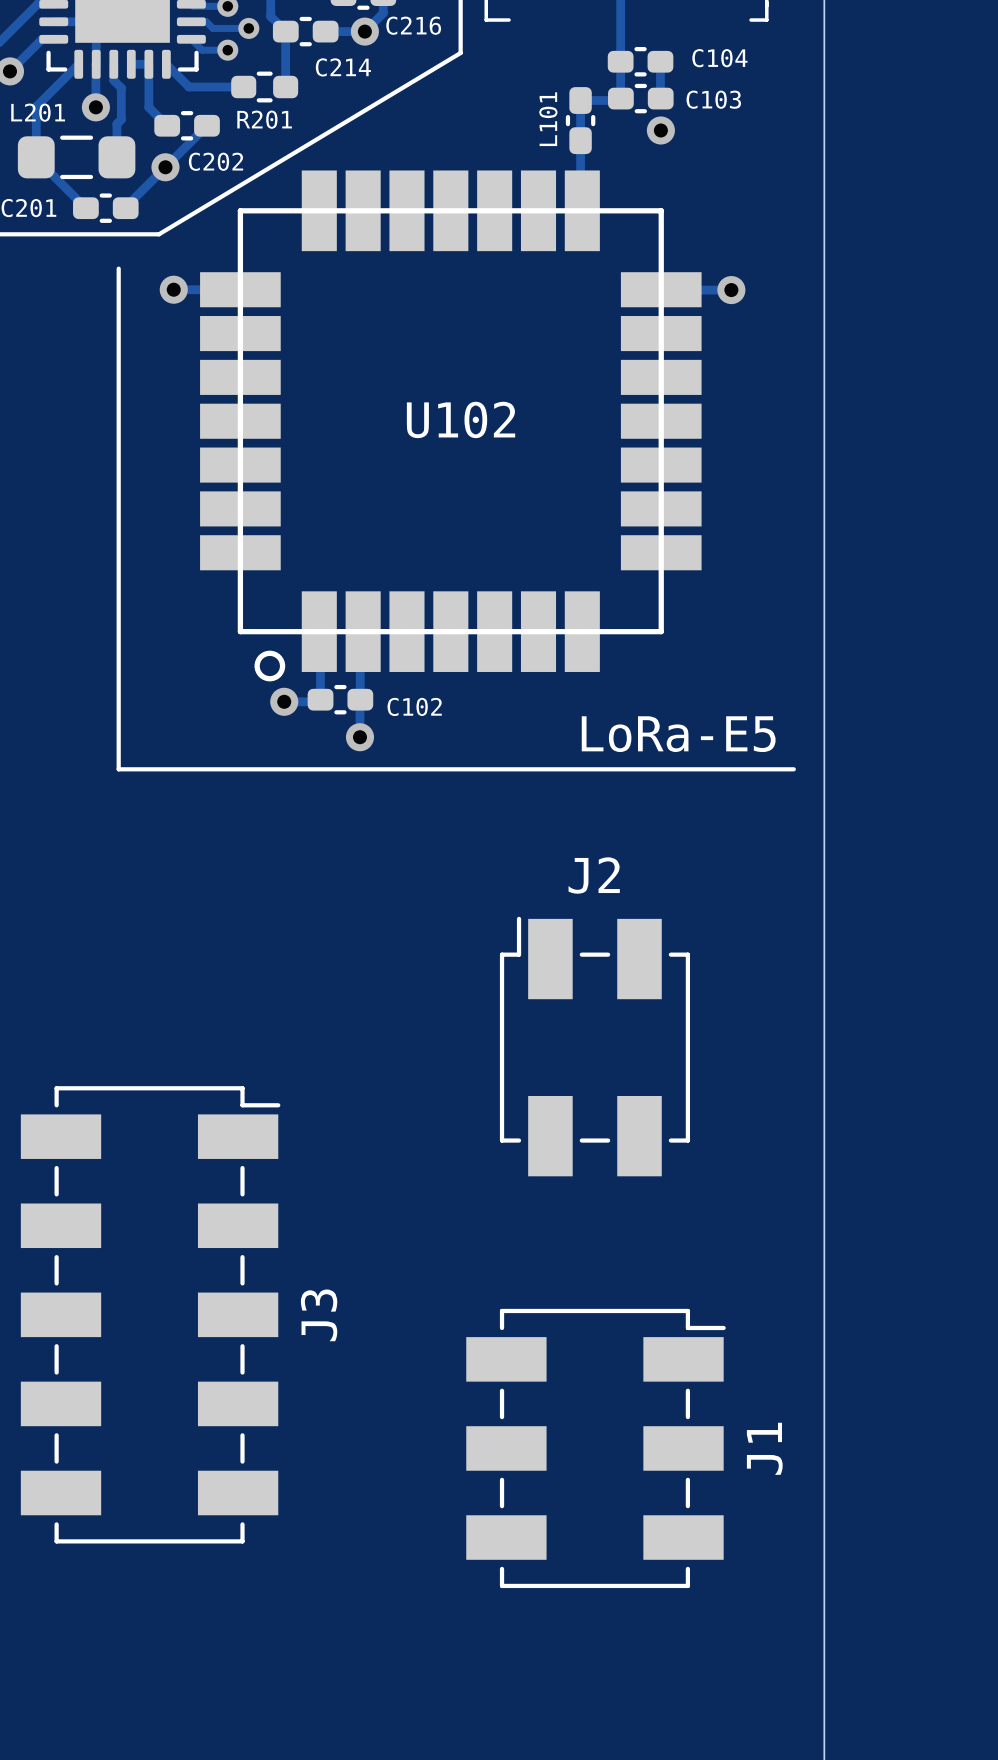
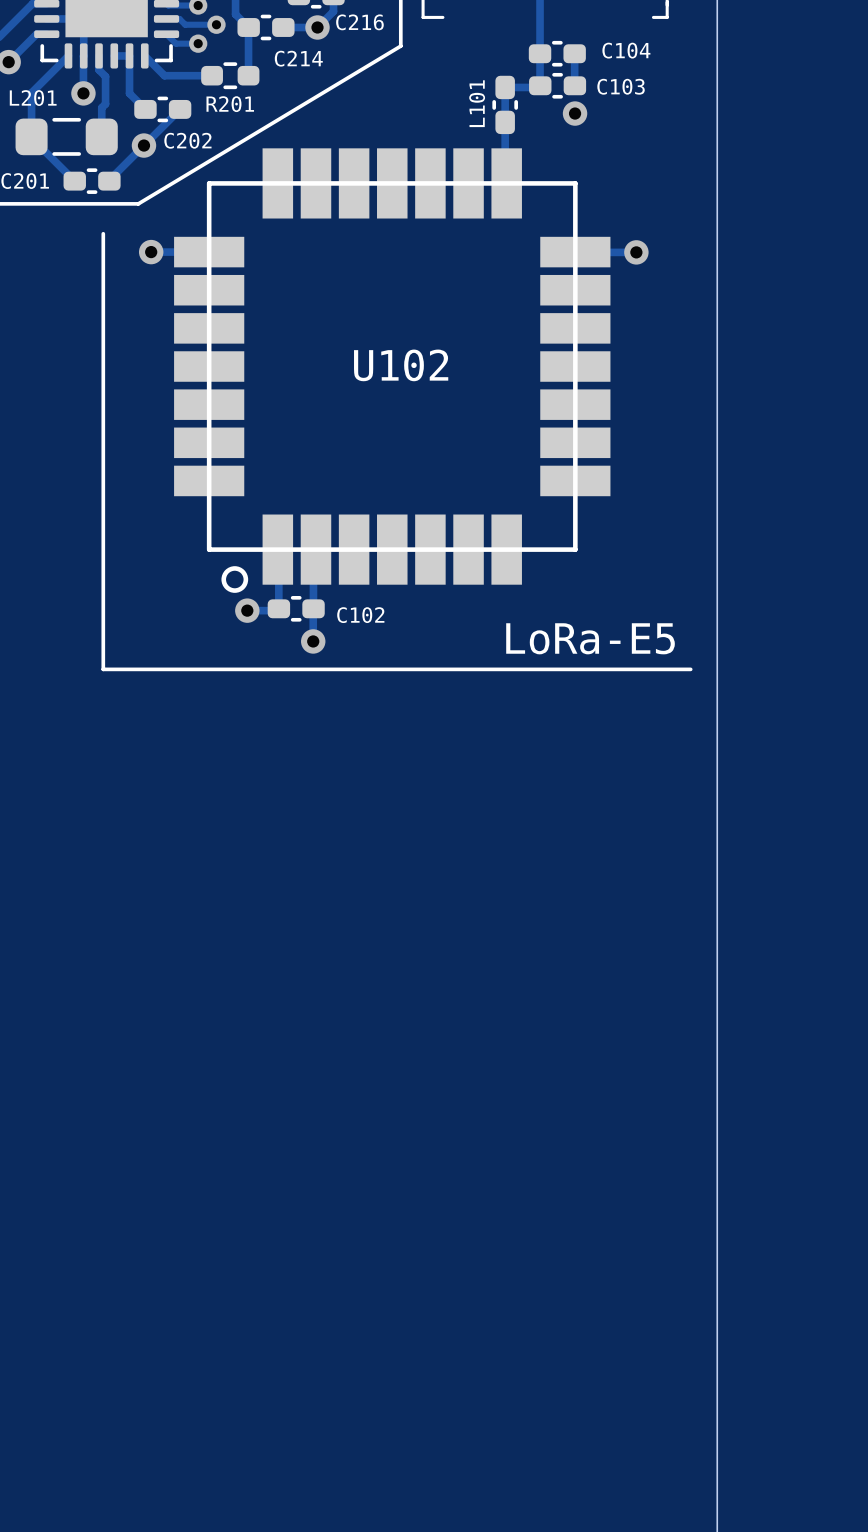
J2: (594, 1046) -> none
J3: (150, 1314) -> none
J1: (596, 1448) -> none

